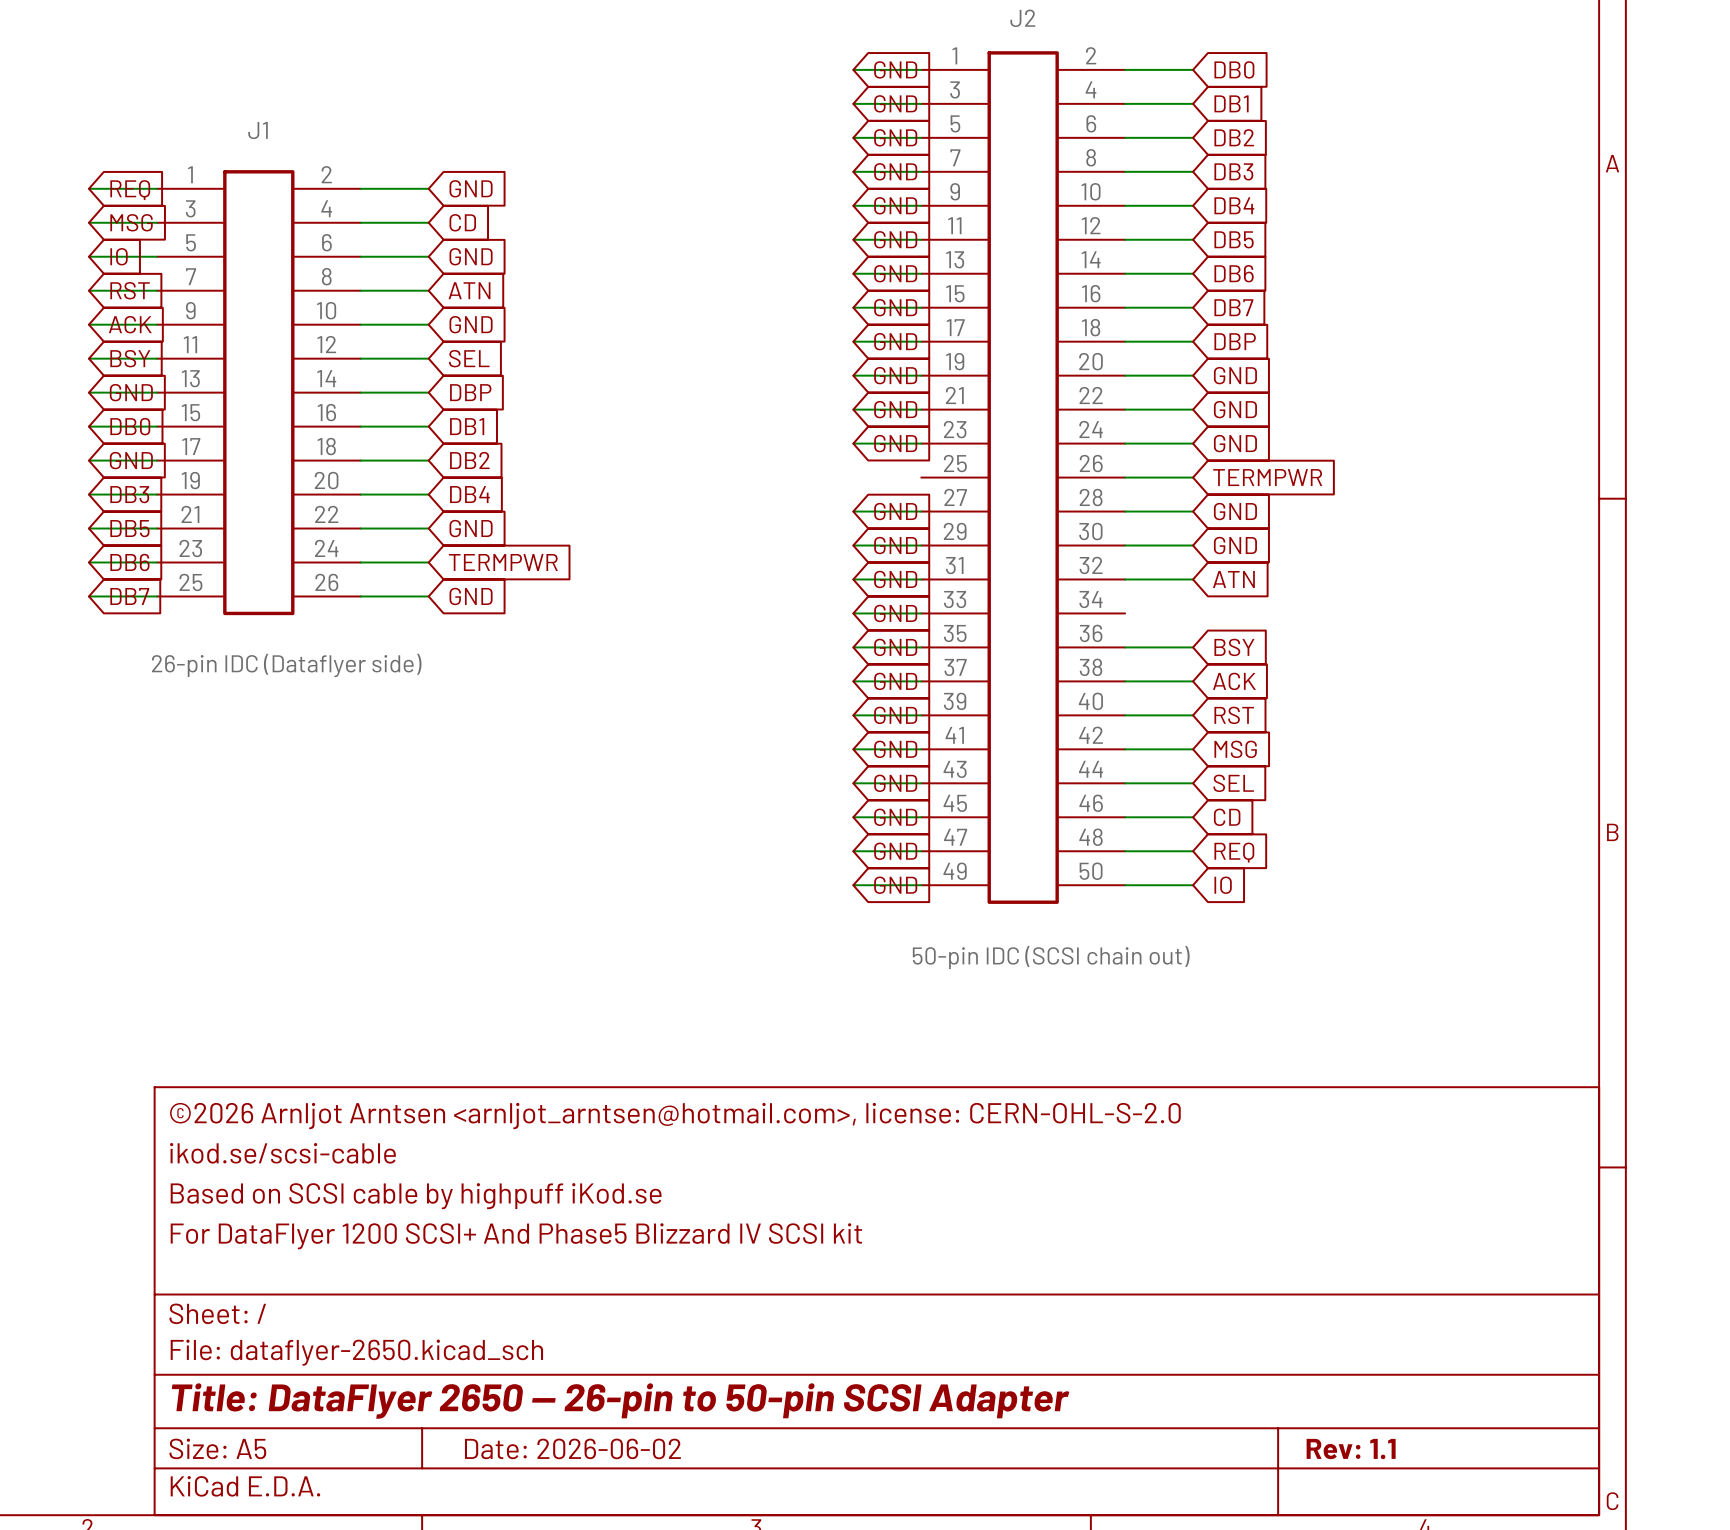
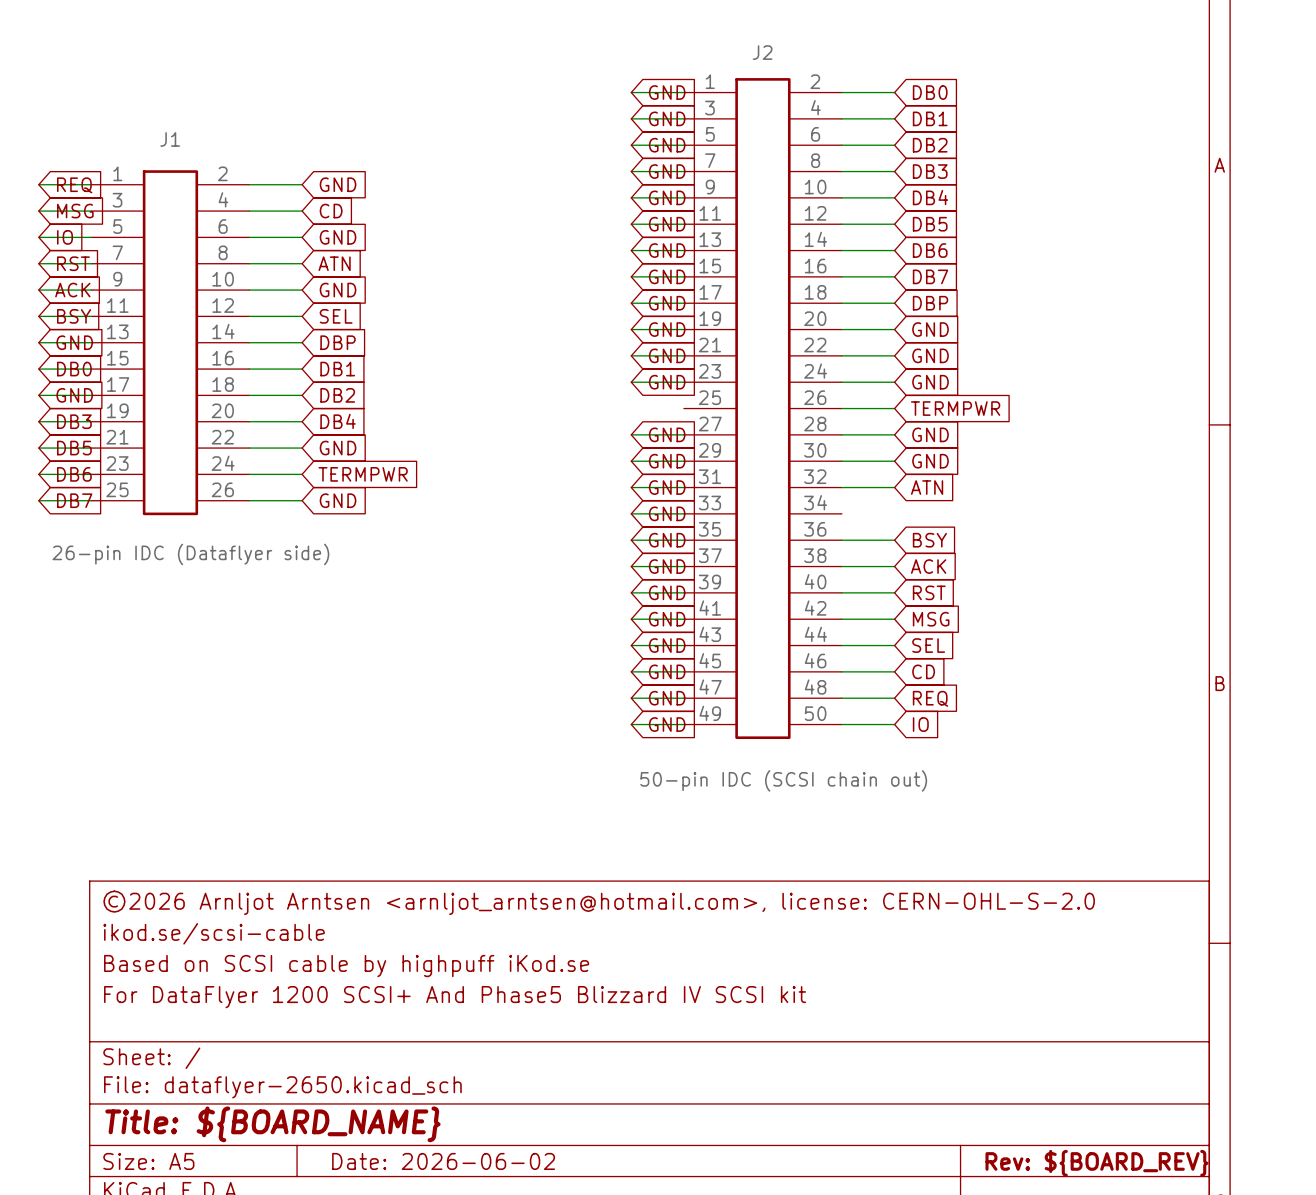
title block: Title: DataFlyer 2650 — 26-pin to 50-pin SCSI Adapter (620, 1401) -> Title: ${BOARD_NAME} (272, 1124)
title block: Rev: 1.1 (1351, 1449) -> Rev: ${BOARD_REV} (1096, 1163)

